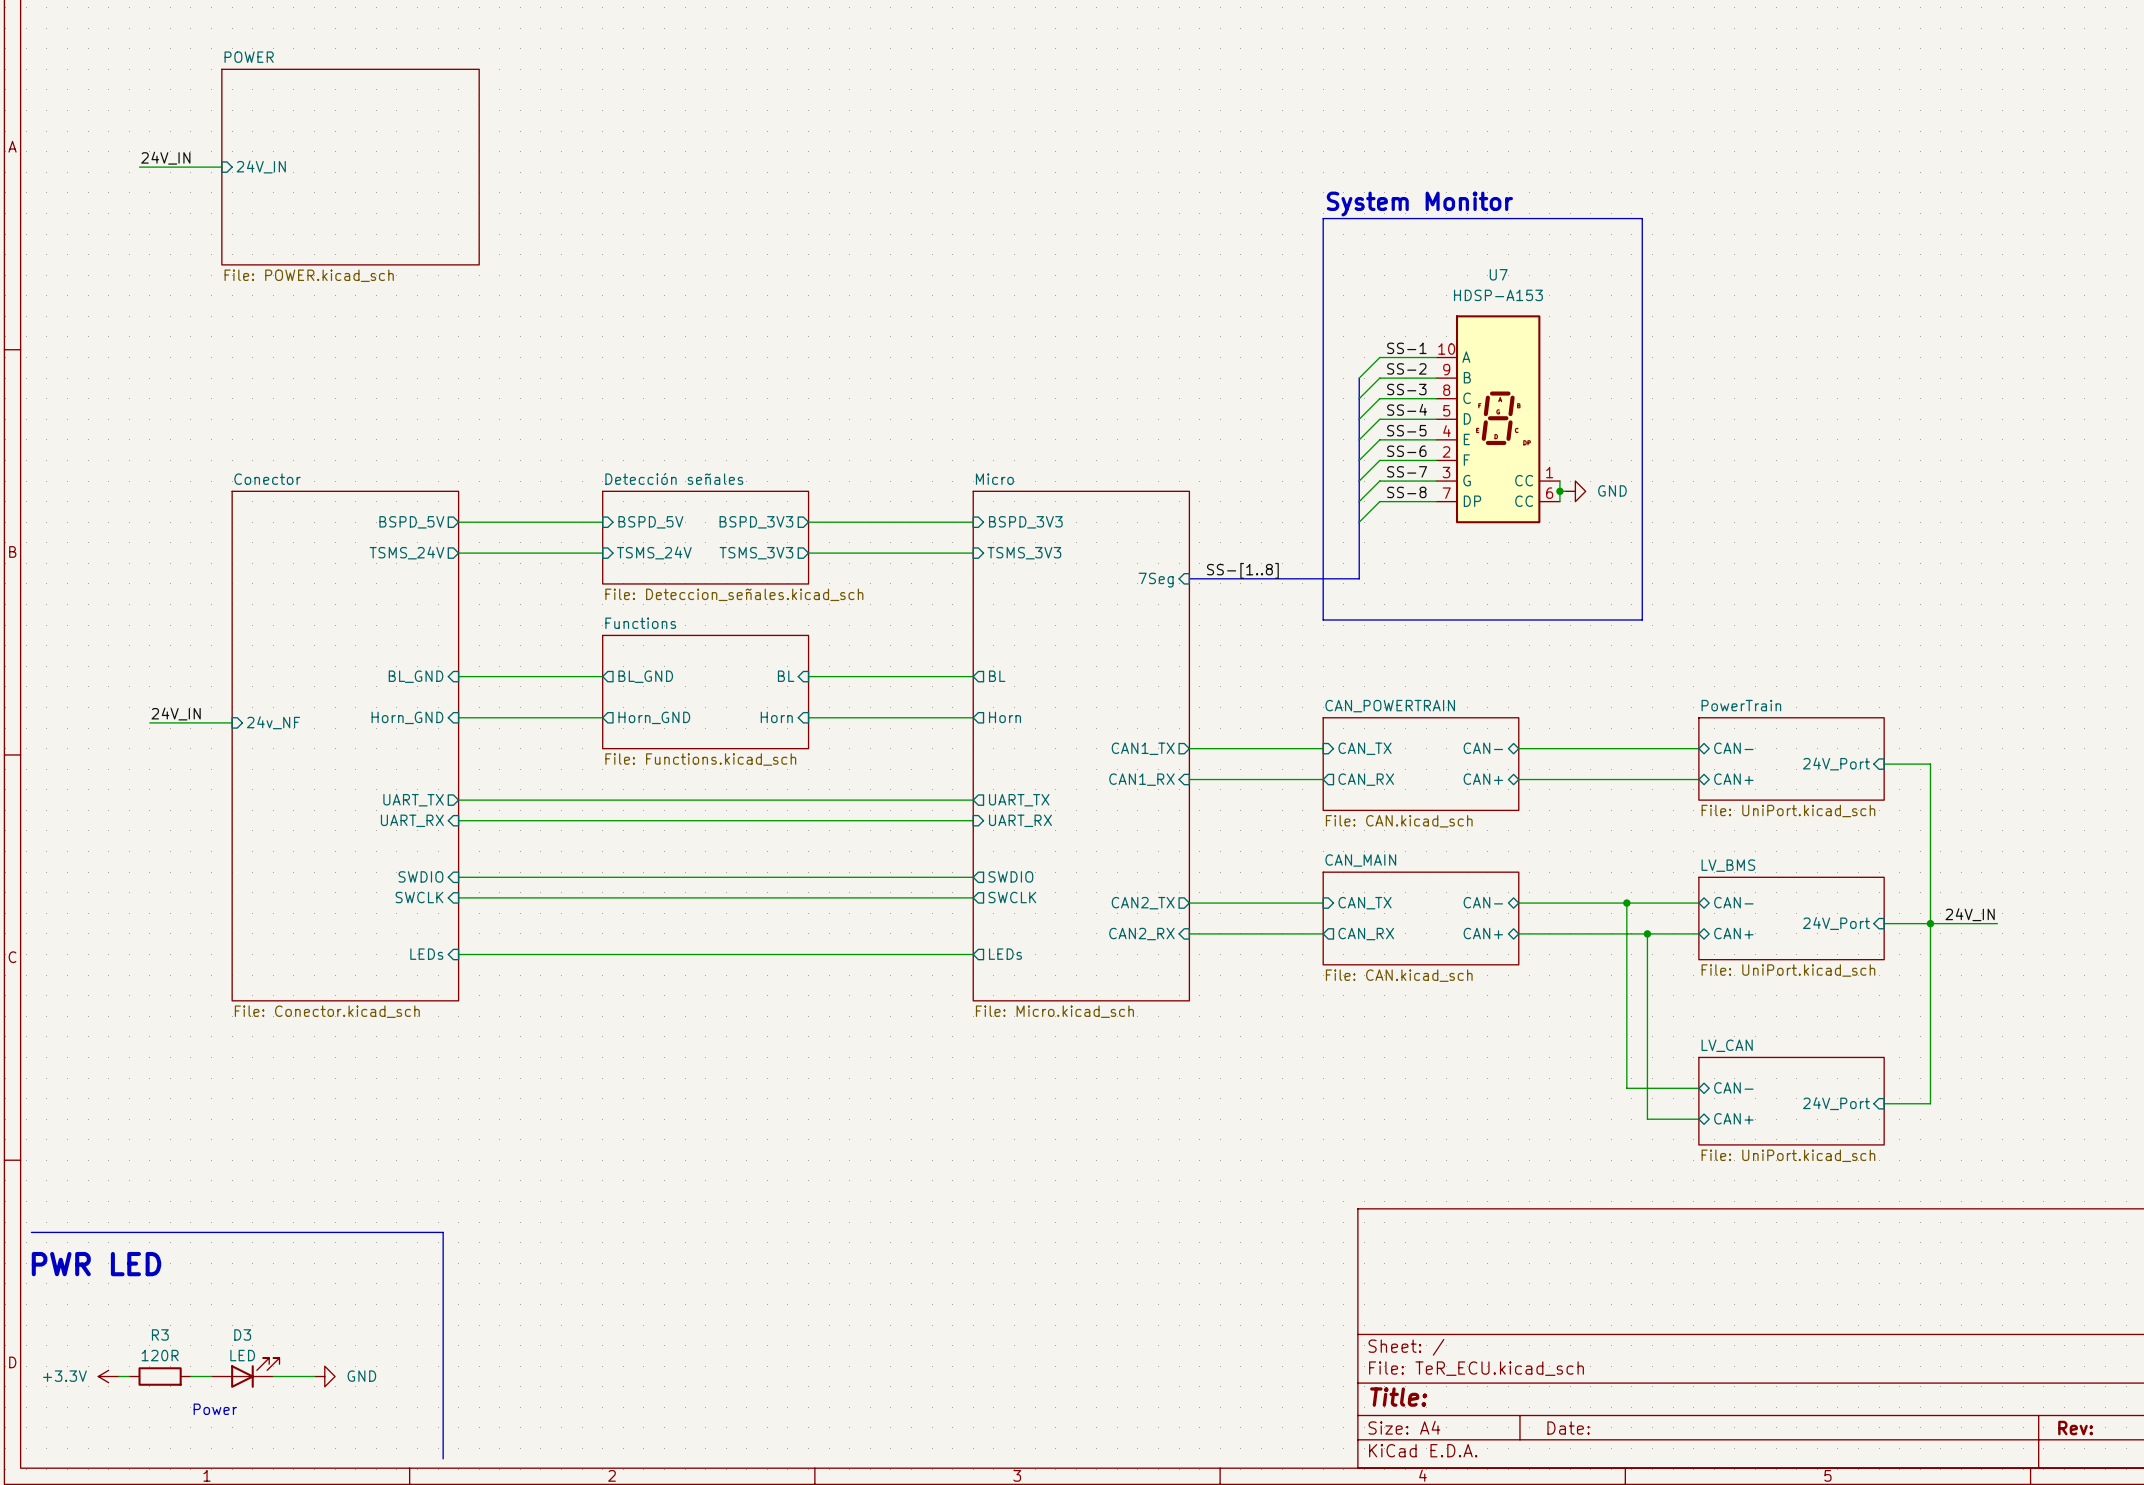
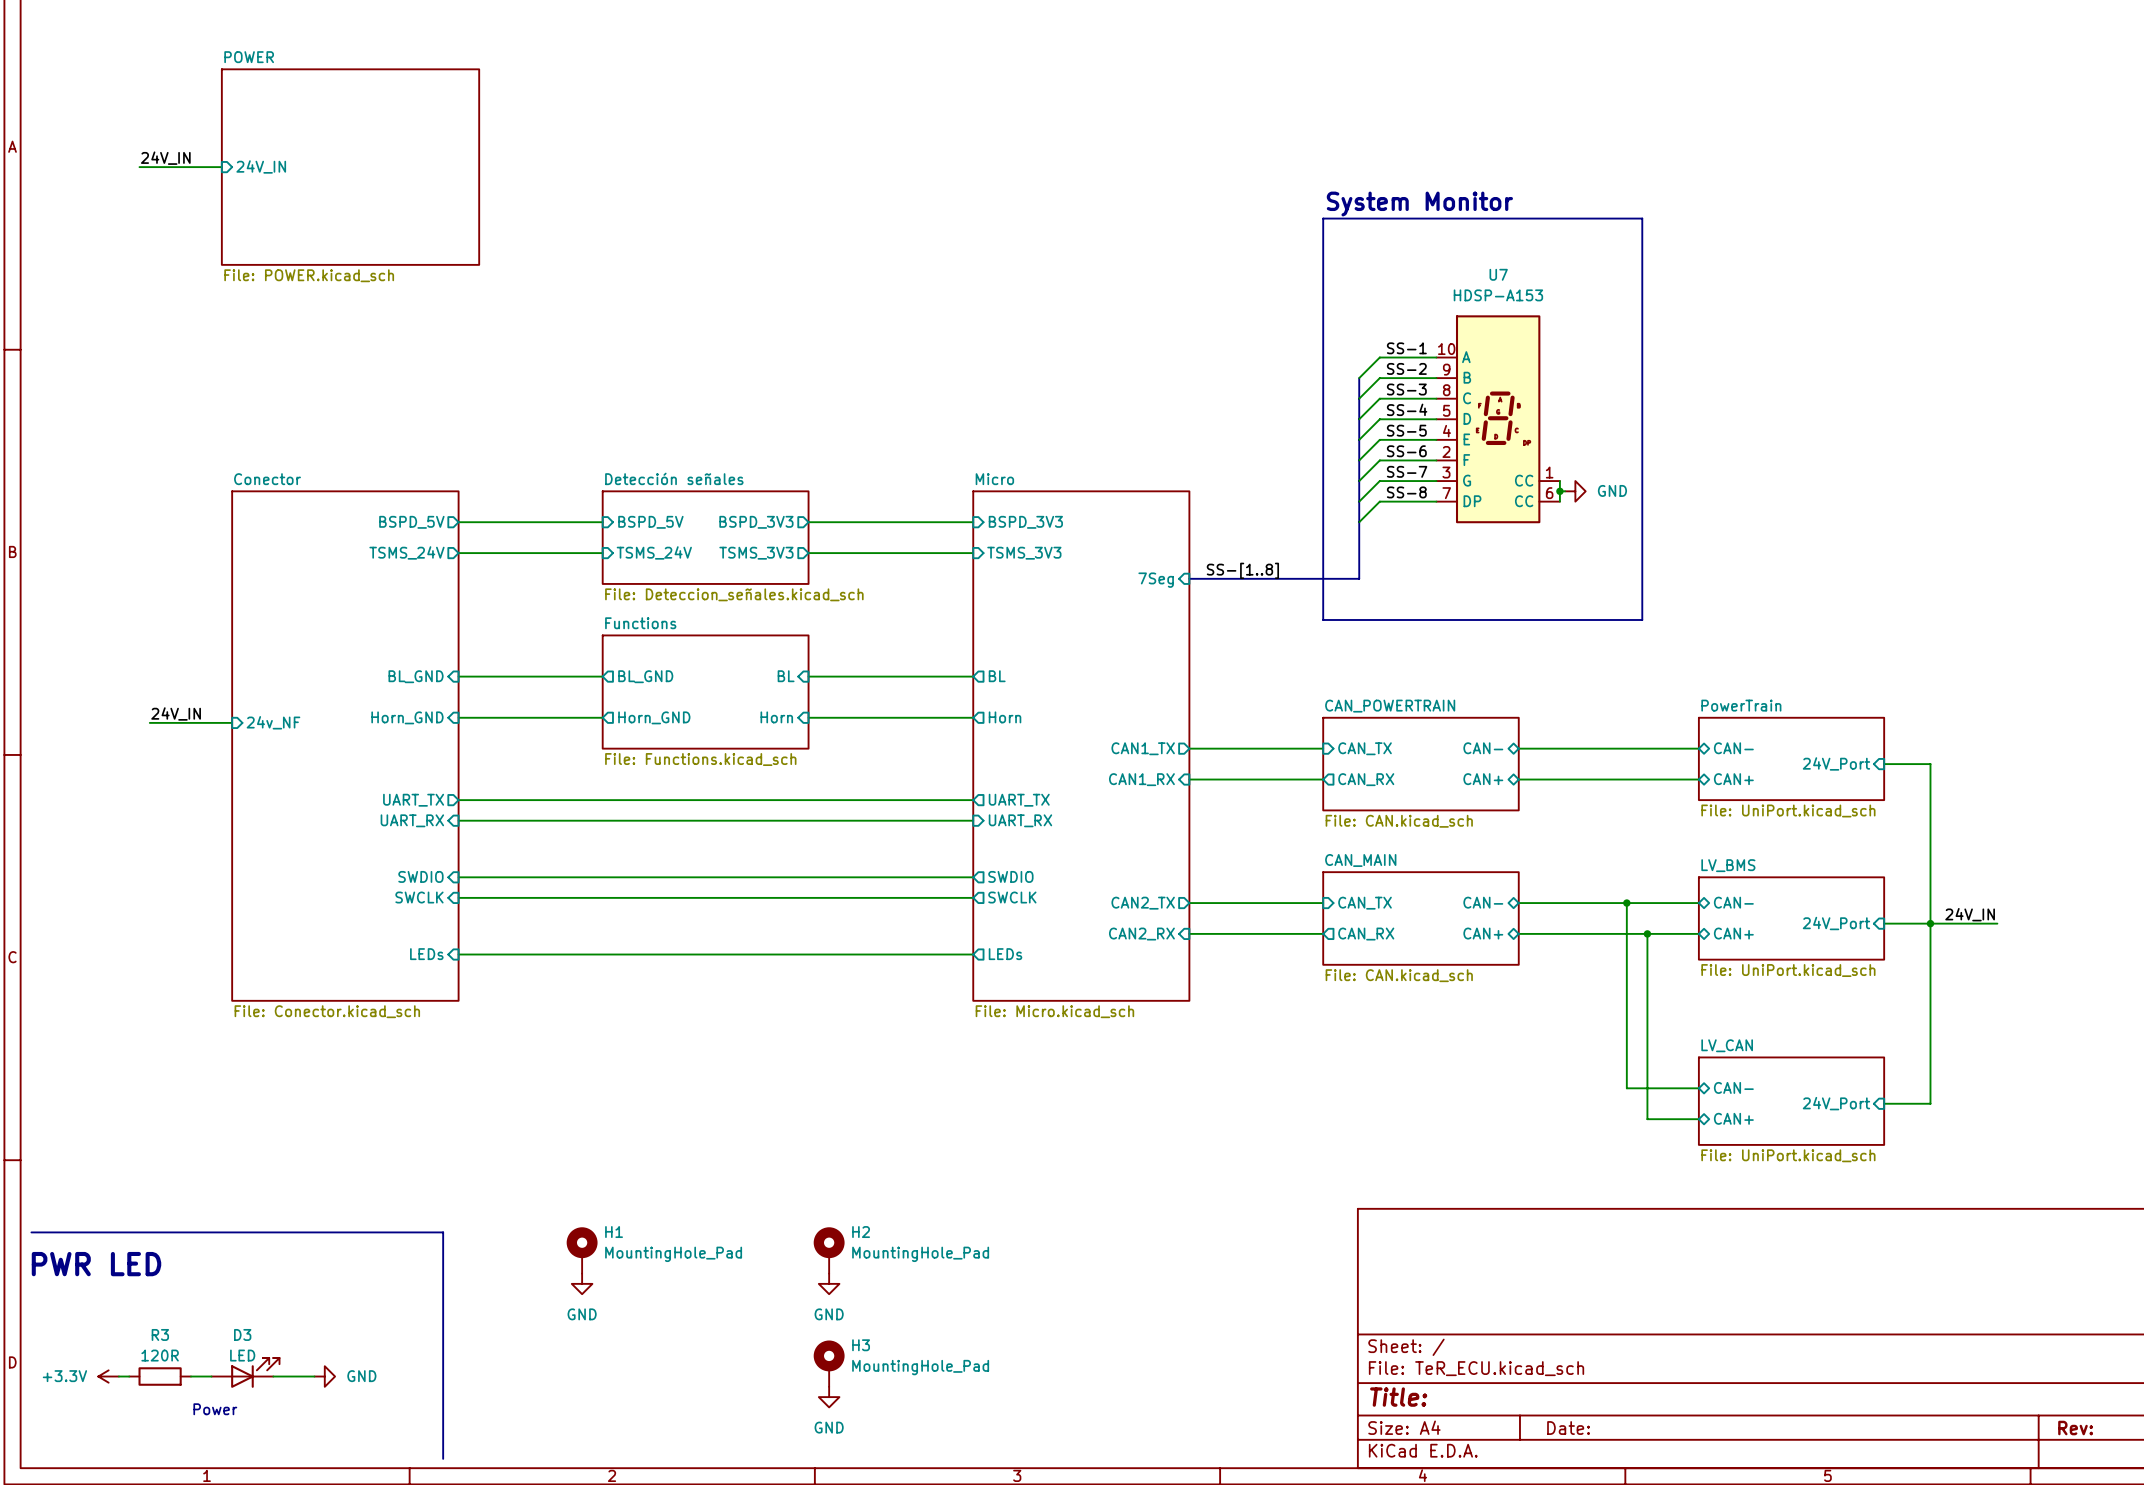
H1: none -> MountingHole_Pad (582, 1250)
H2: none -> MountingHole_Pad (829, 1250)
power symbol: none -> GND (582, 1283)
power symbol: none -> GND (829, 1283)
H3: none -> MountingHole_Pad (829, 1363)
power symbol: none -> GND (829, 1397)

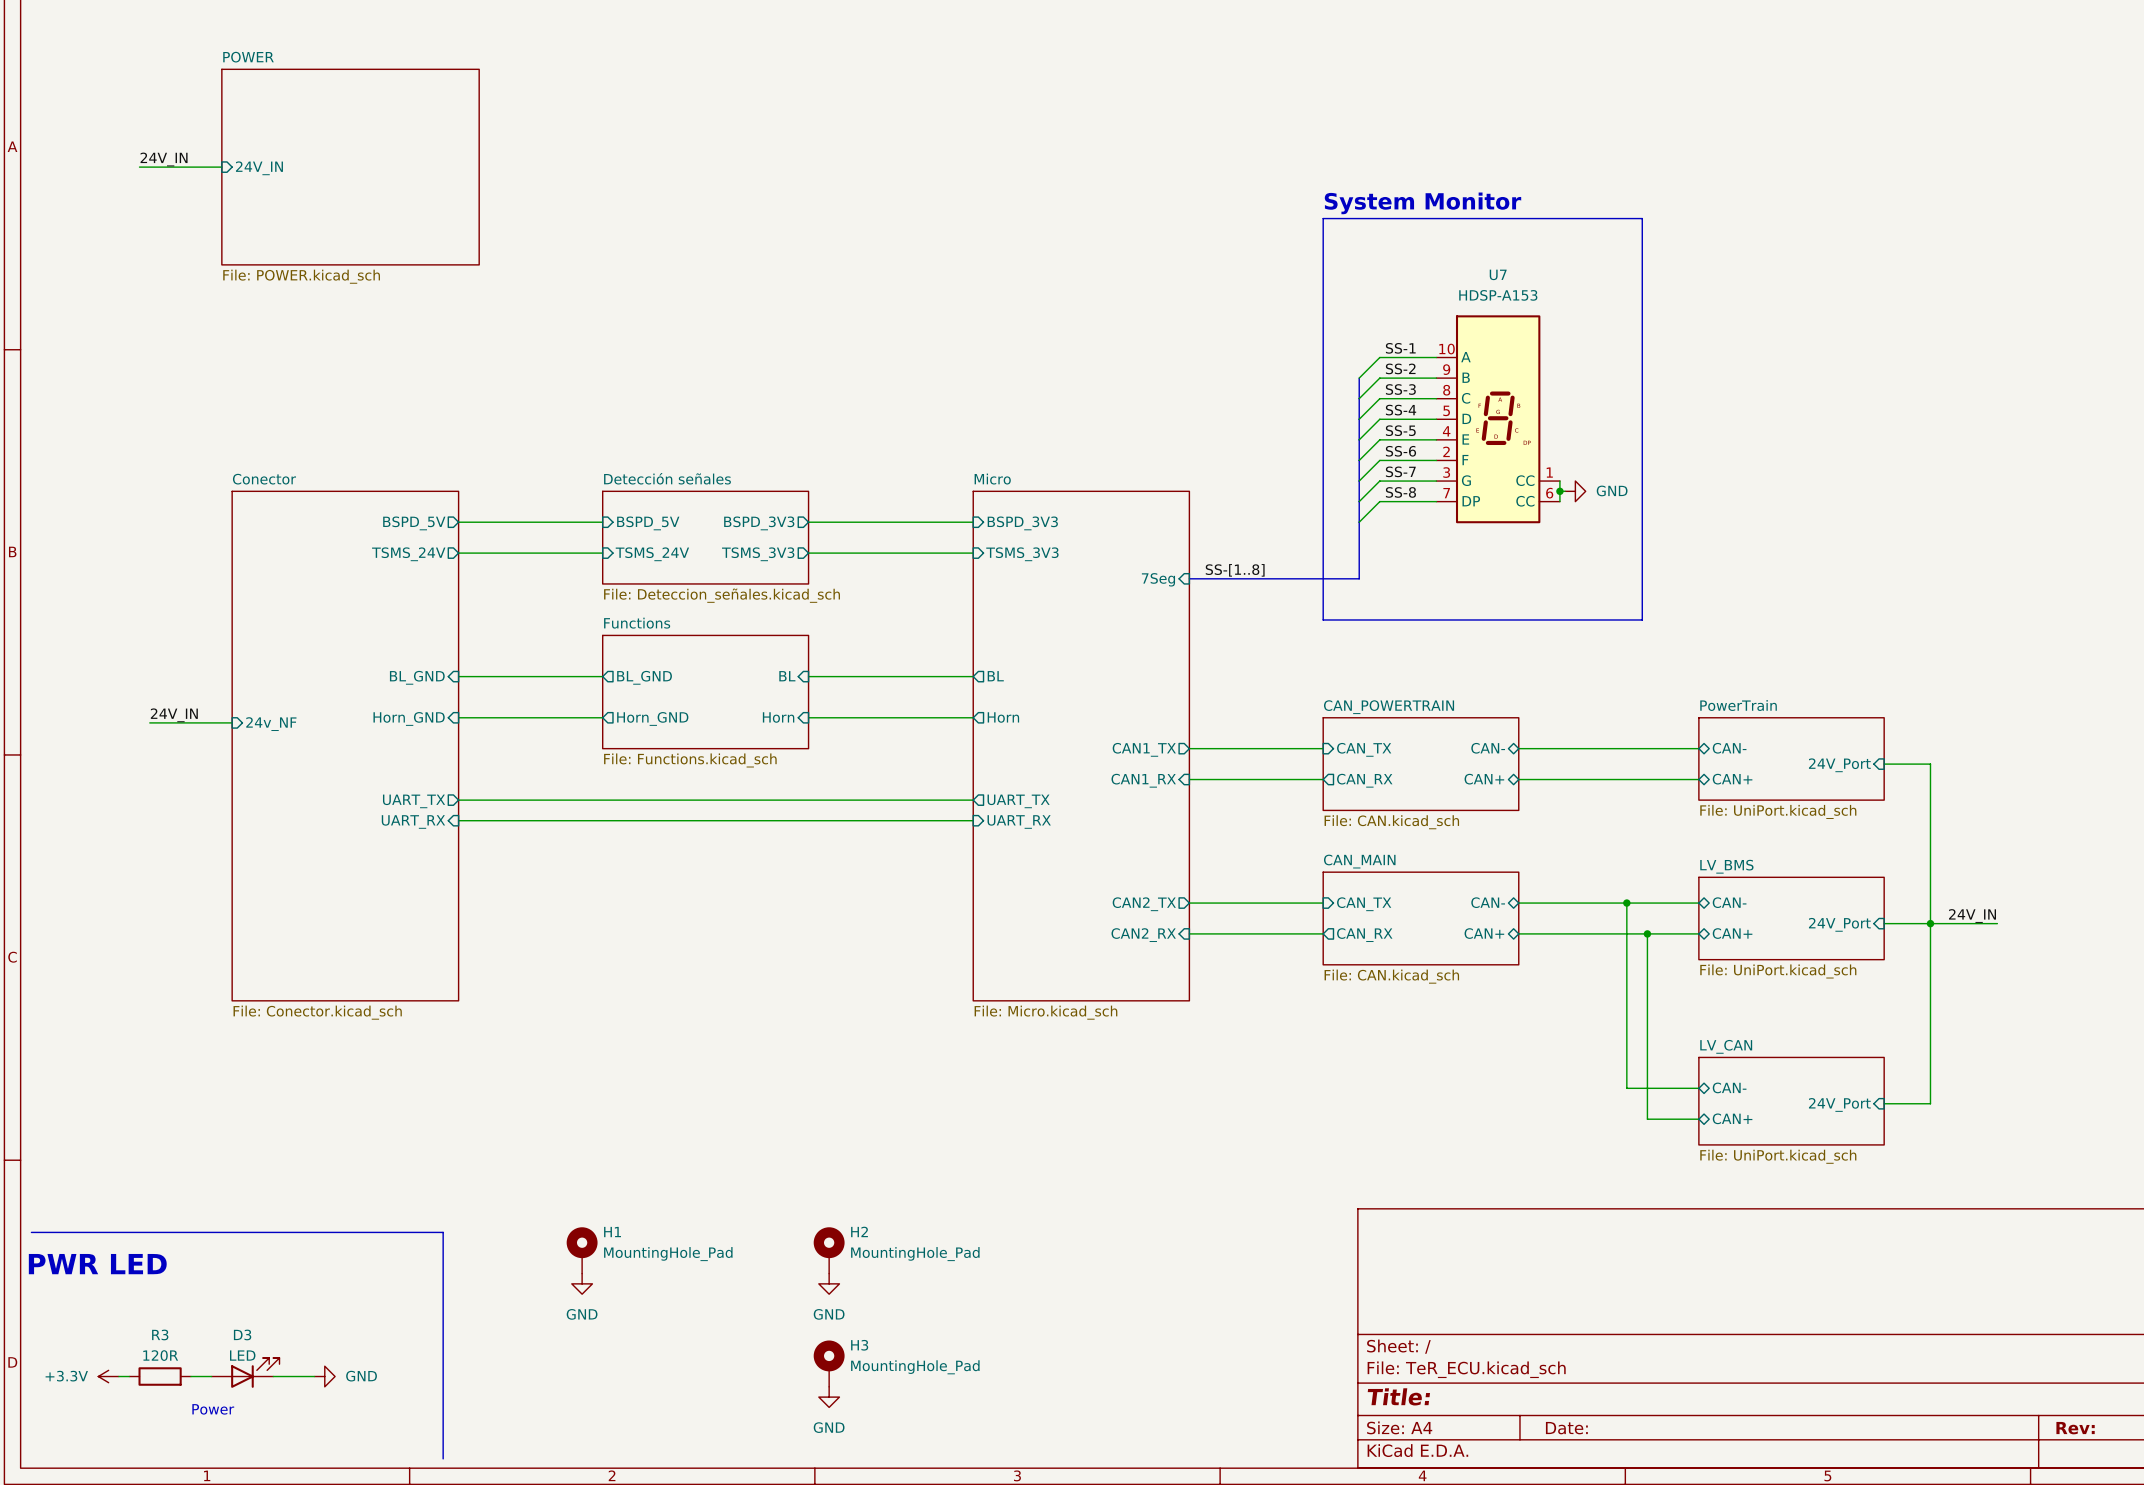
sheet pin: SWDIO (420, 876) -> none
sheet pin: SWDIO (1010, 876) -> none
wire: (458, 877) (973, 877) -> none
sheet pin: SWCLK (419, 897) -> none
wire: (458, 897) (973, 897) -> none
sheet pin: SWCLK (1012, 897) -> none
sheet pin: LEDs (426, 954) -> none
wire: (458, 954) (973, 954) -> none
sheet pin: LEDs (1005, 954) -> none

